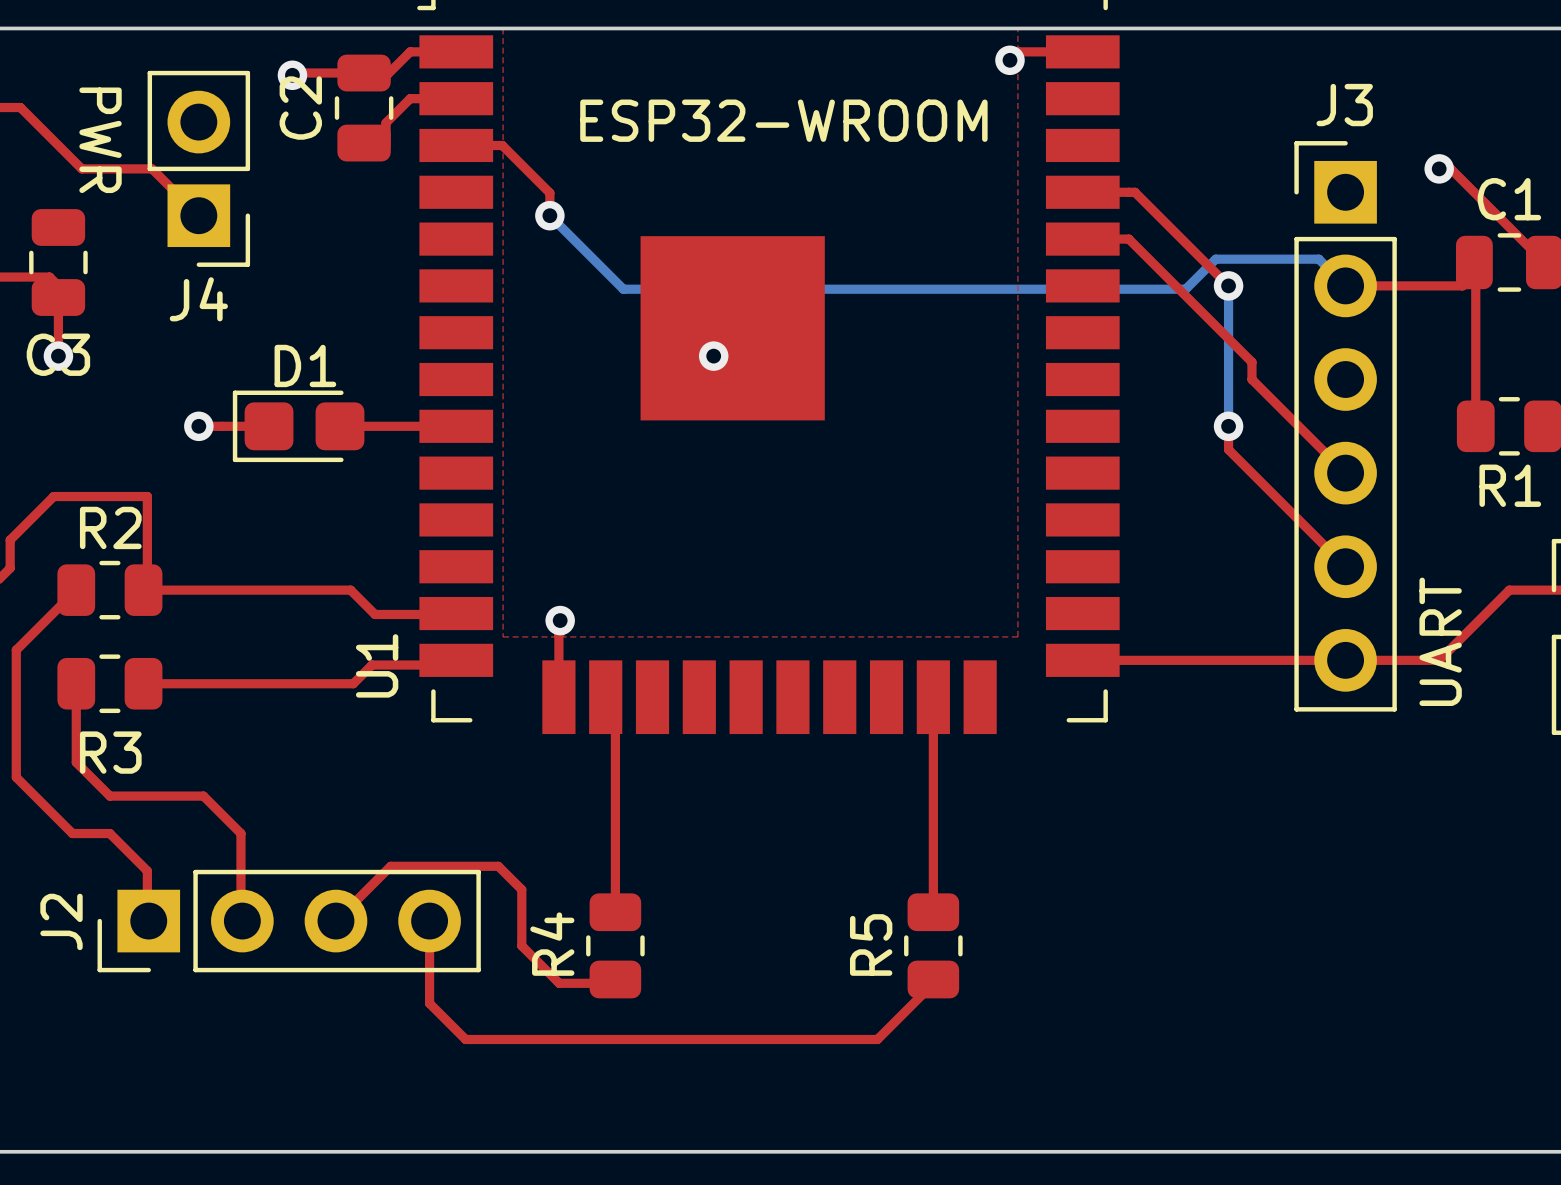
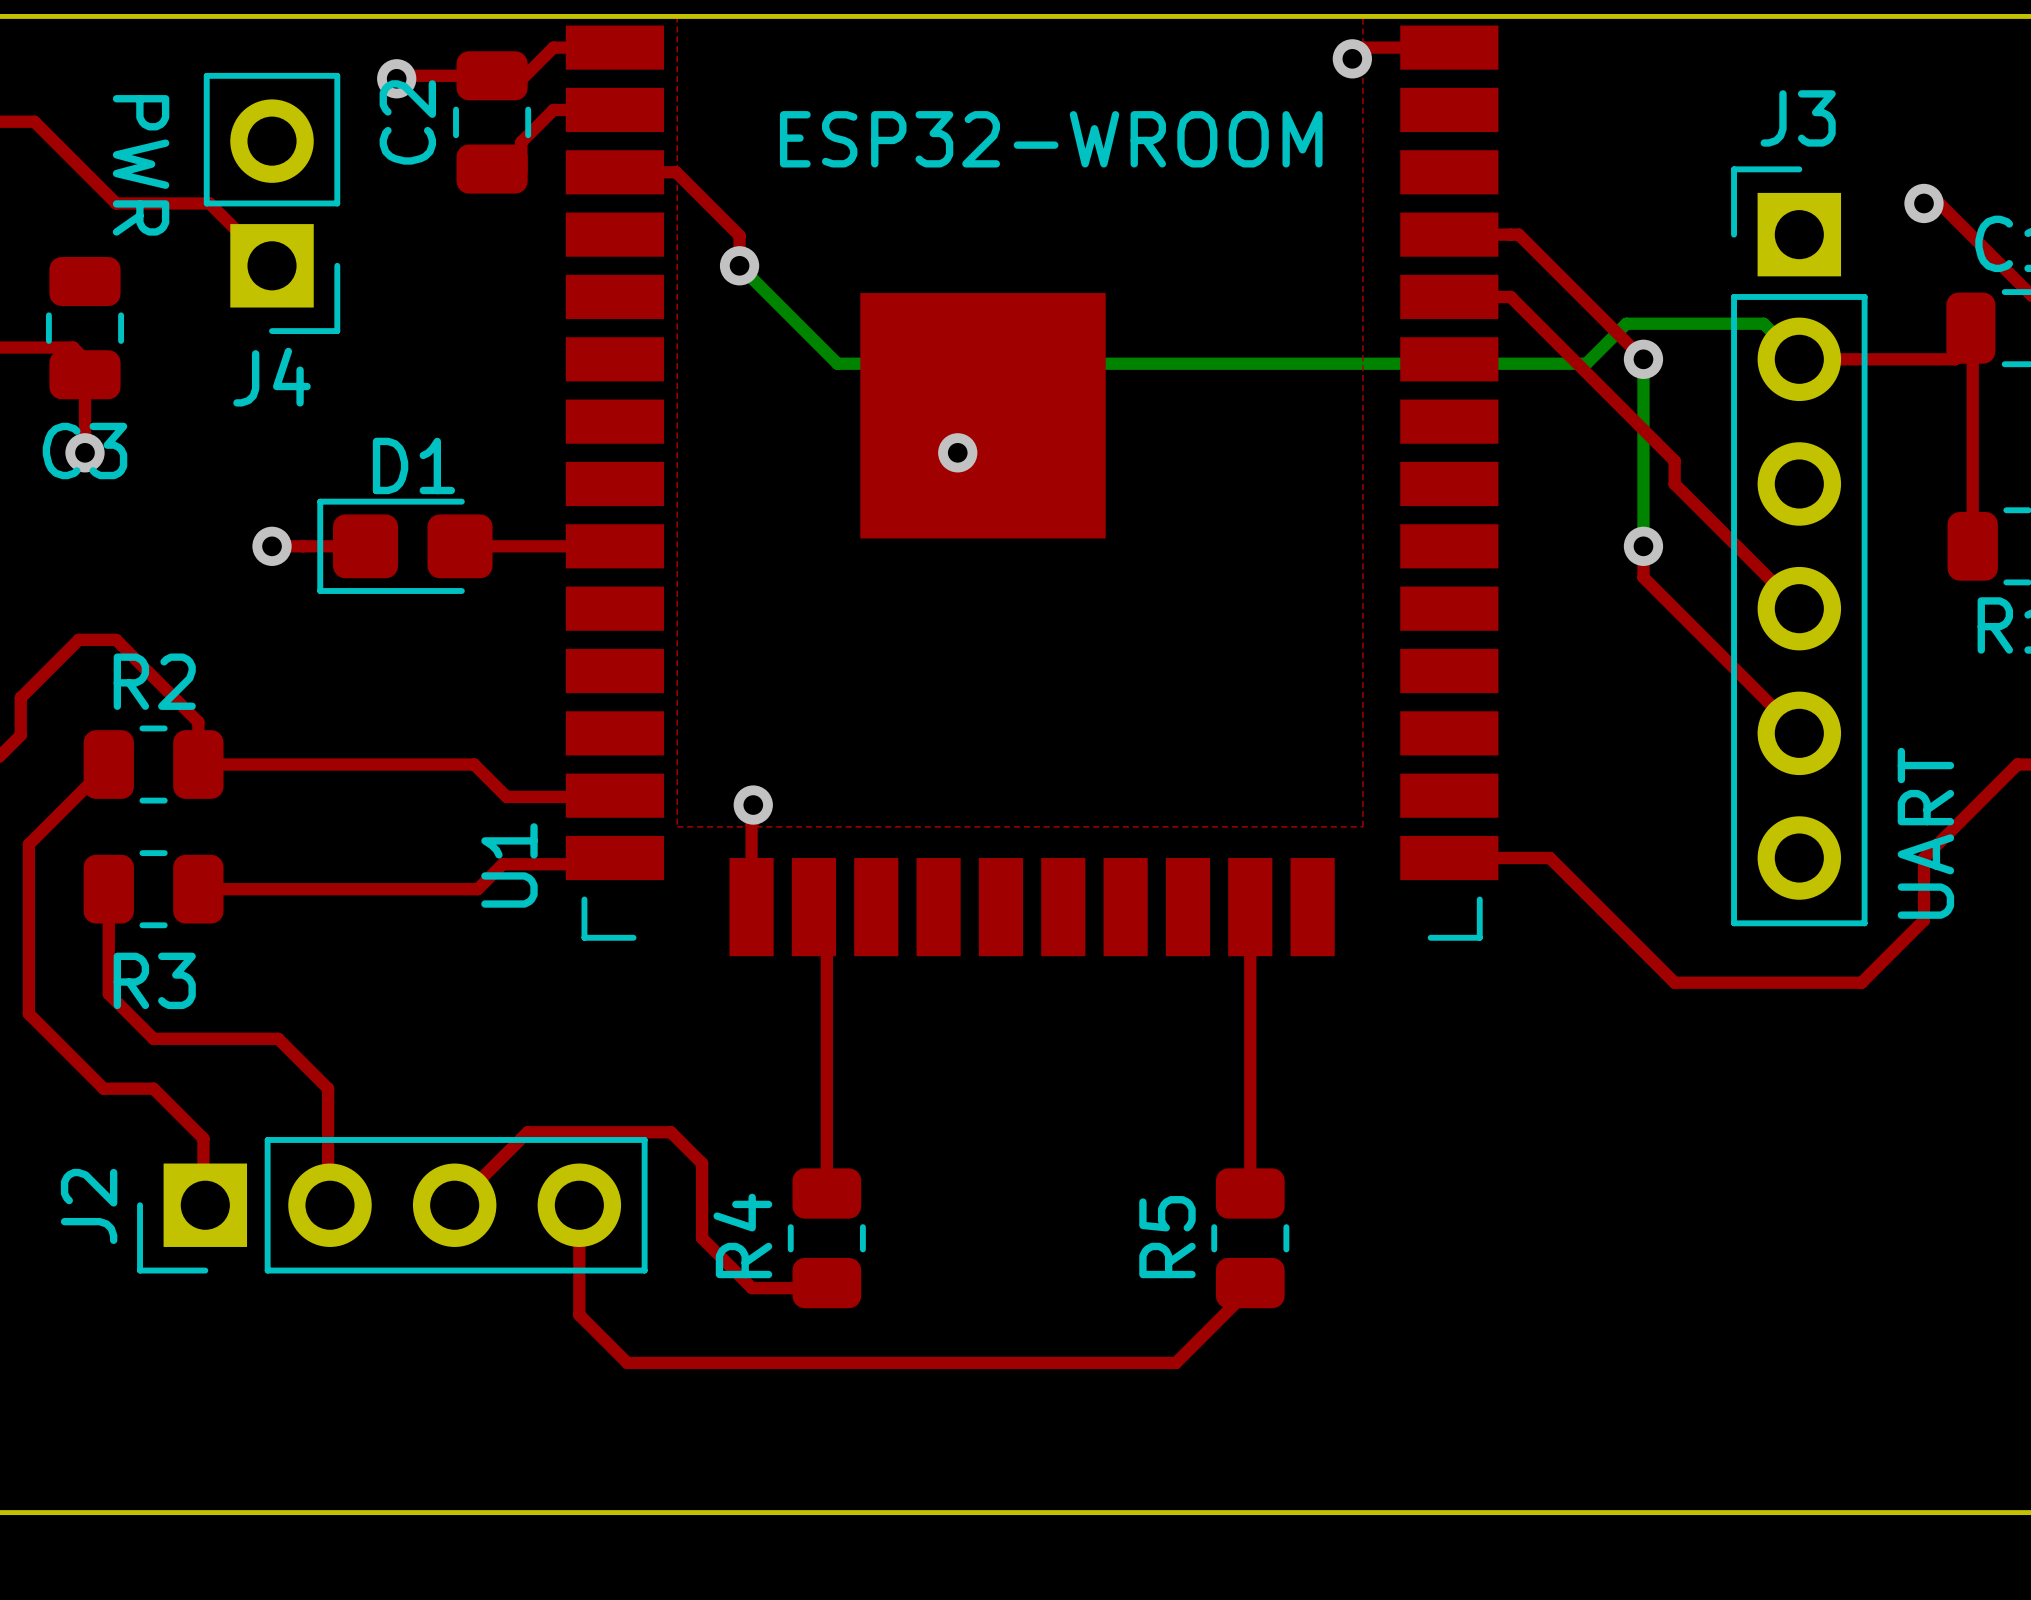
top track: (81, 496) (147, 496) (147, 590) -> (116, 639) (198, 722) (198, 759)
top track: (1158, 660) (1439, 660) -> (1549, 858) (1674, 982) (1861, 982) (1924, 920) (1924, 858)

